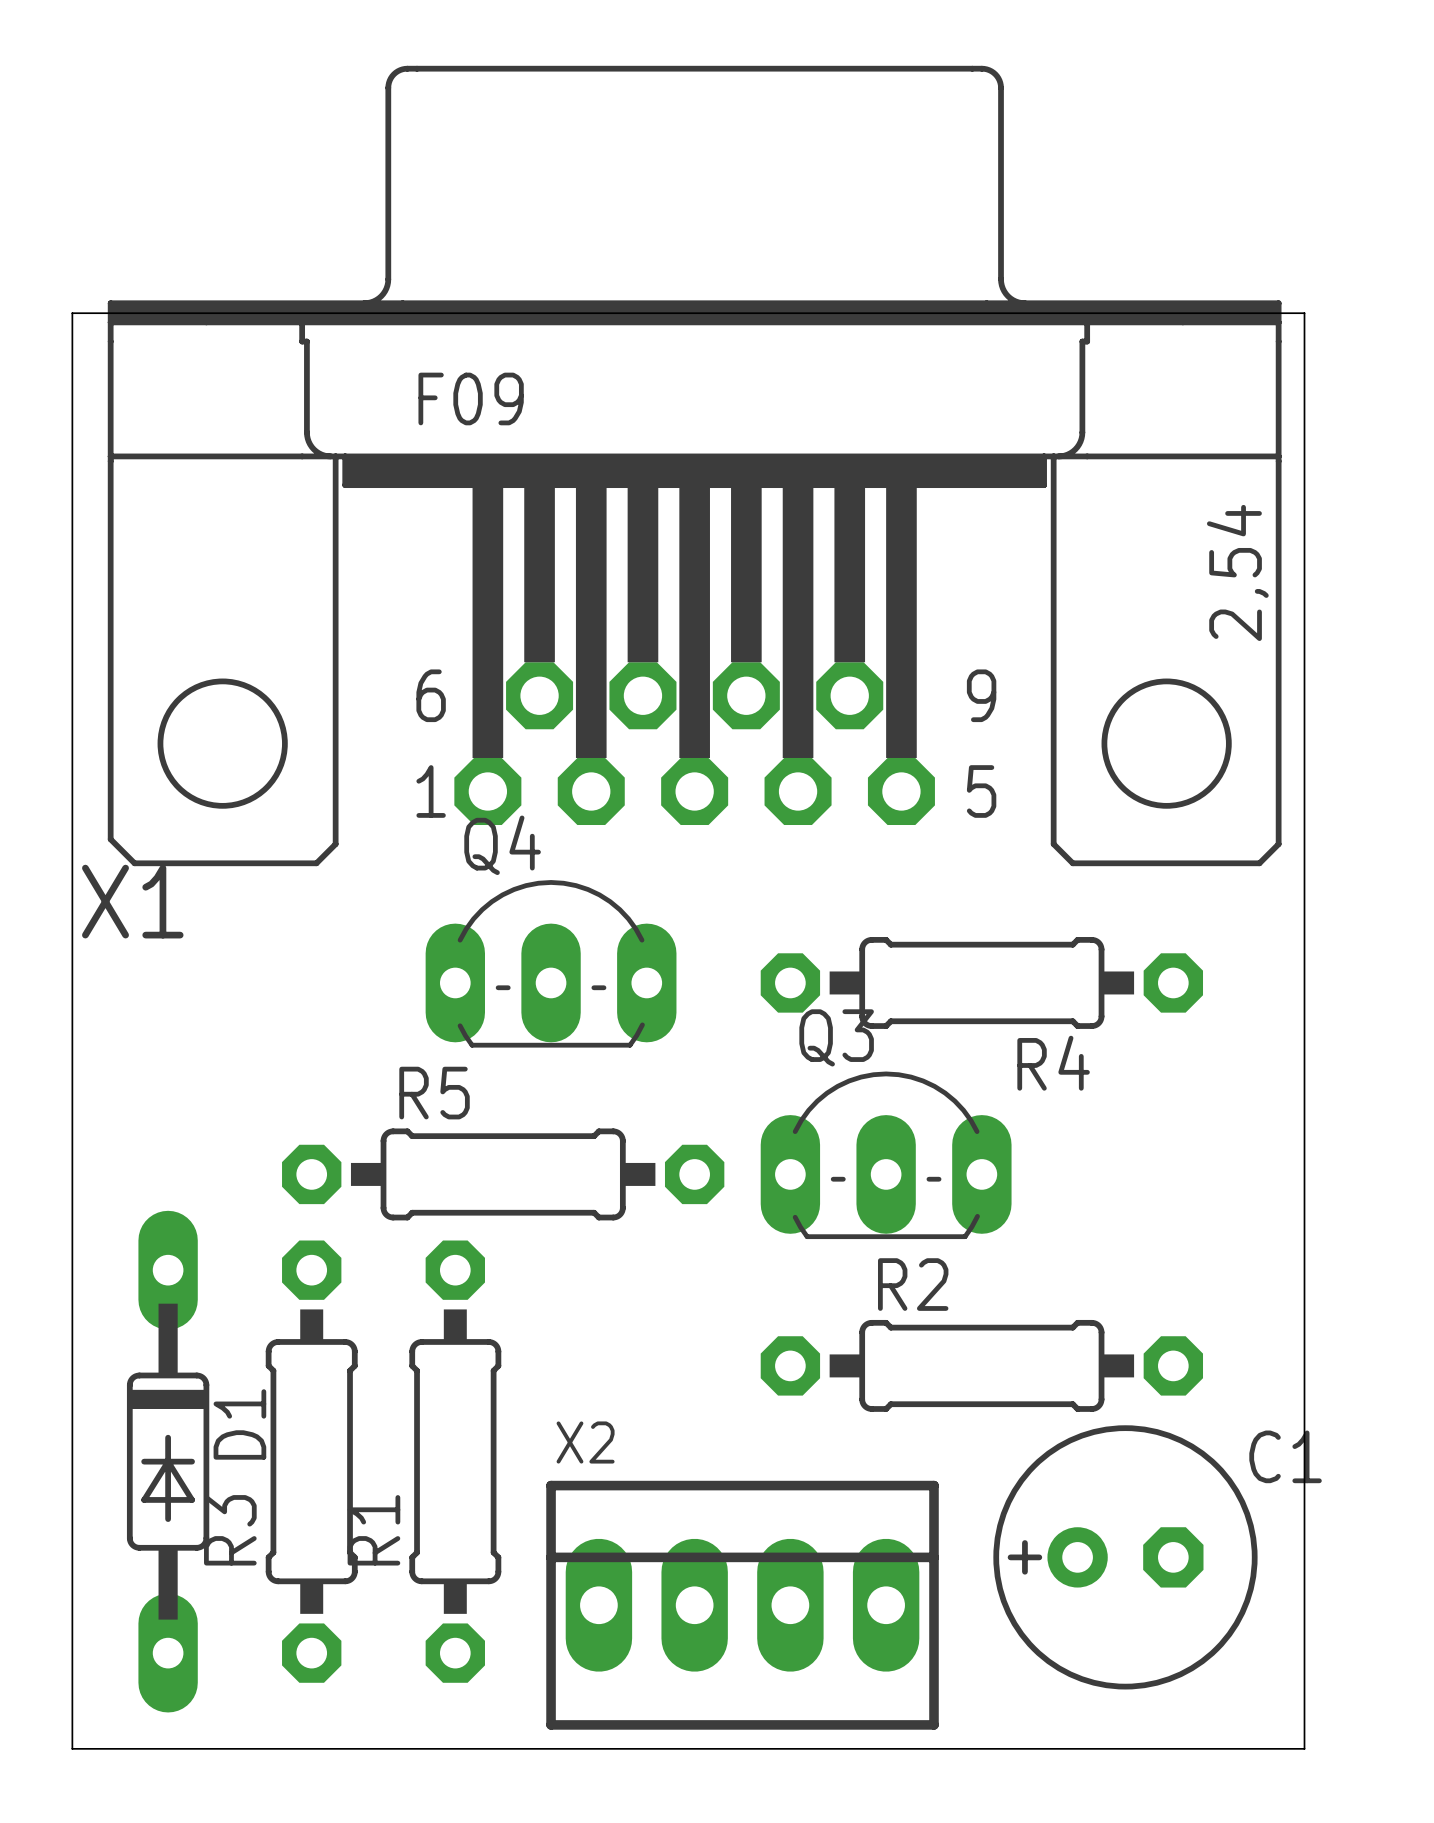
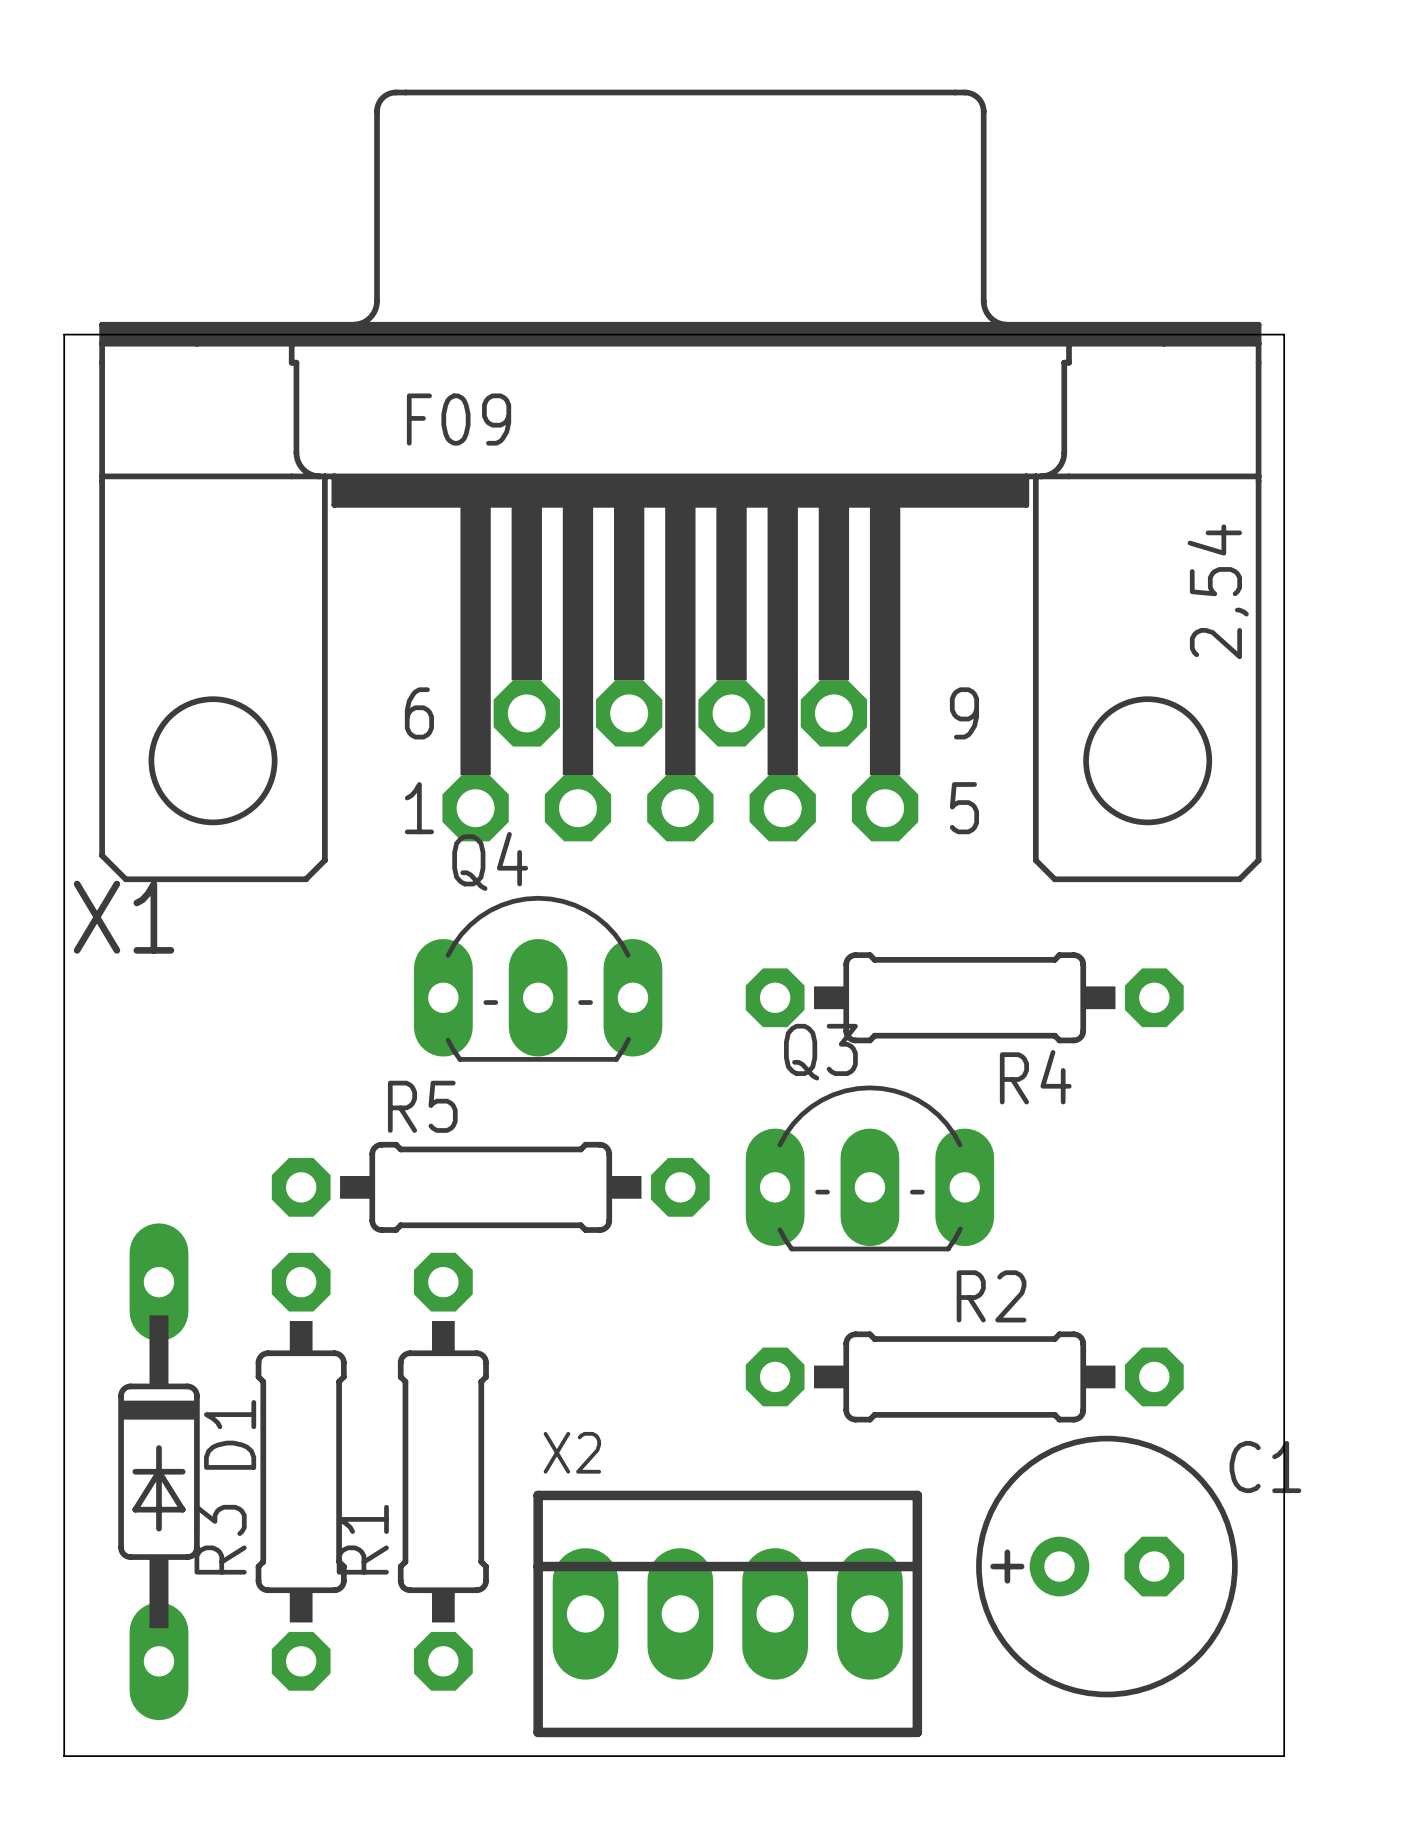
R2 name position: R2 (913, 1284) -> R2 (991, 1296)

